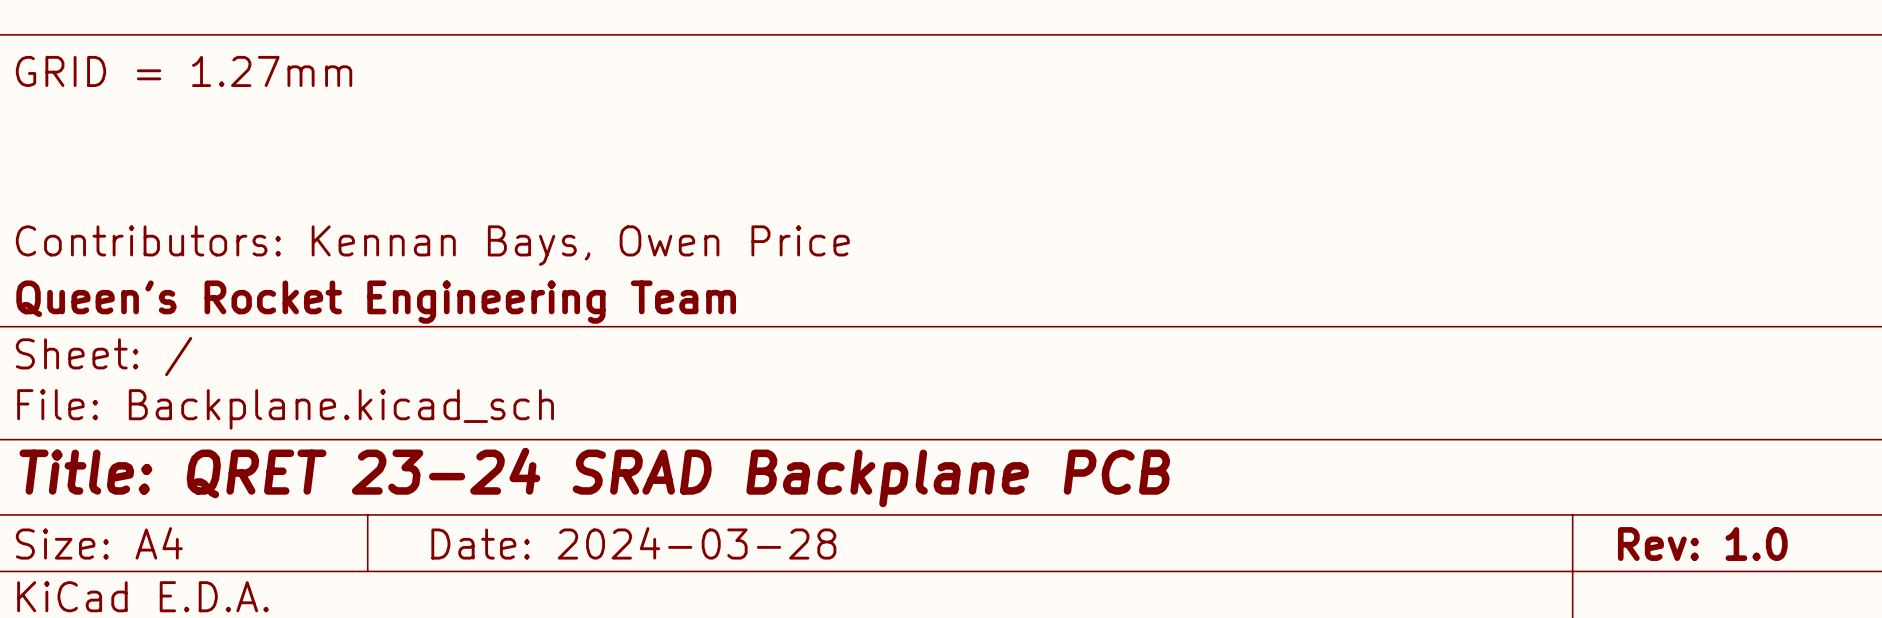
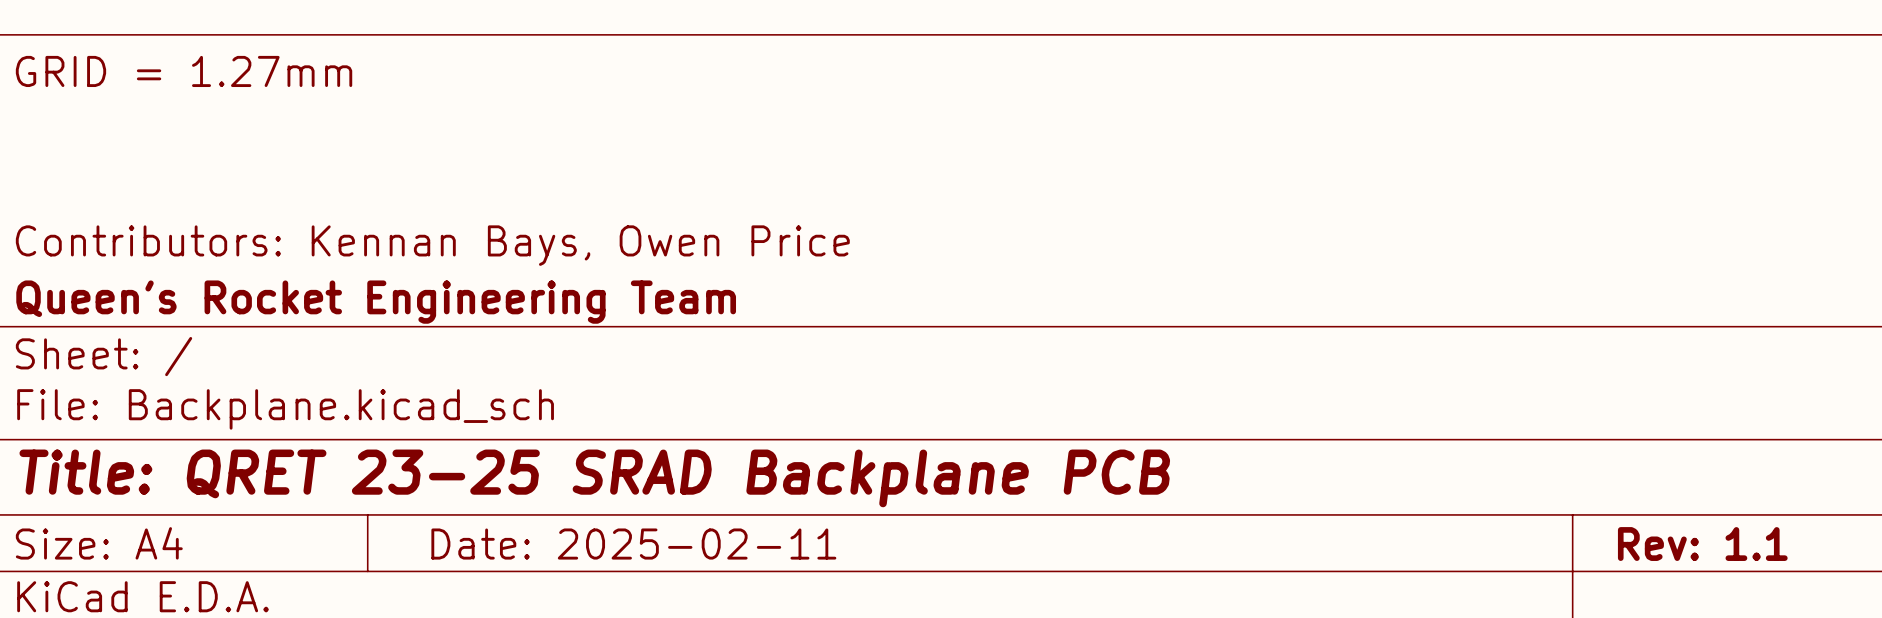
title block: Title: QRET 23-24 SRAD Backplane PCB (594, 477) -> Title: QRET 23-25 SRAD Backplane PCB (594, 478)
title block: Date: 2024-03-28 (633, 543) -> Date: 2025-02-11 (633, 544)
title block: Rev: 1.0 (1702, 544) -> Rev: 1.1 (1702, 544)

